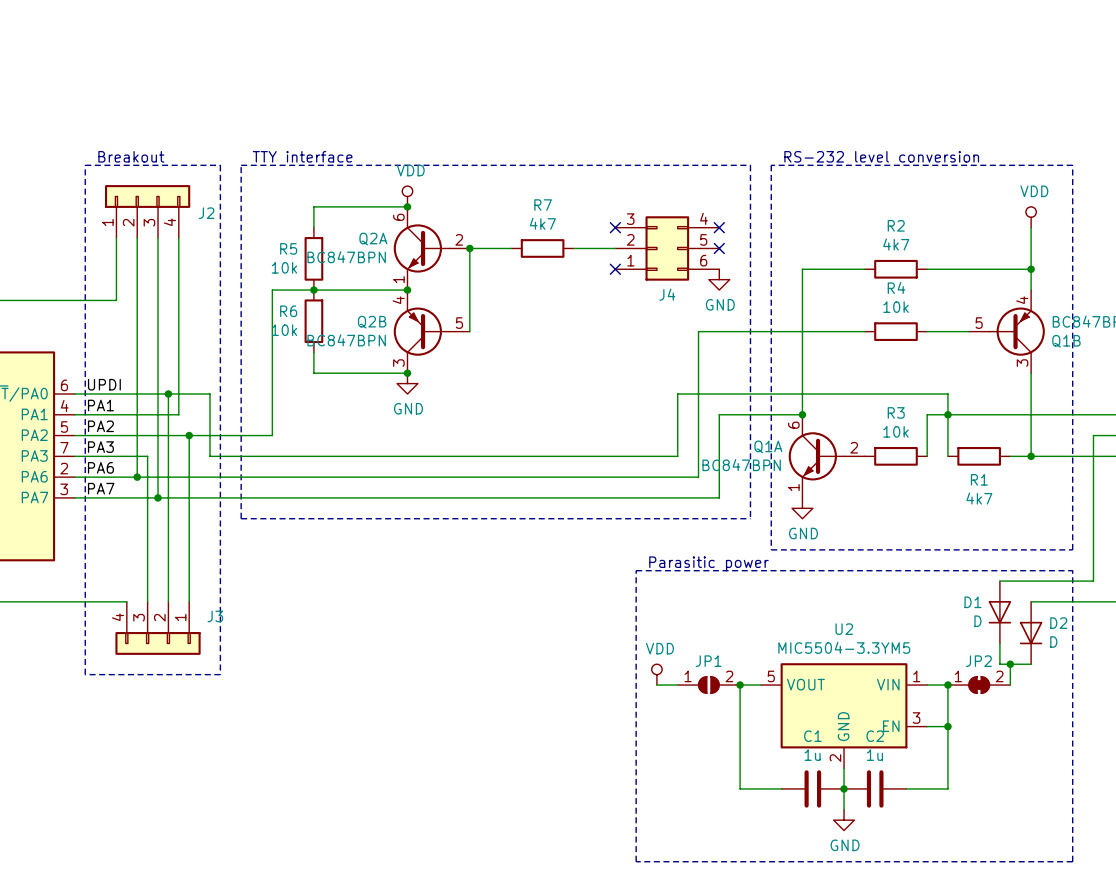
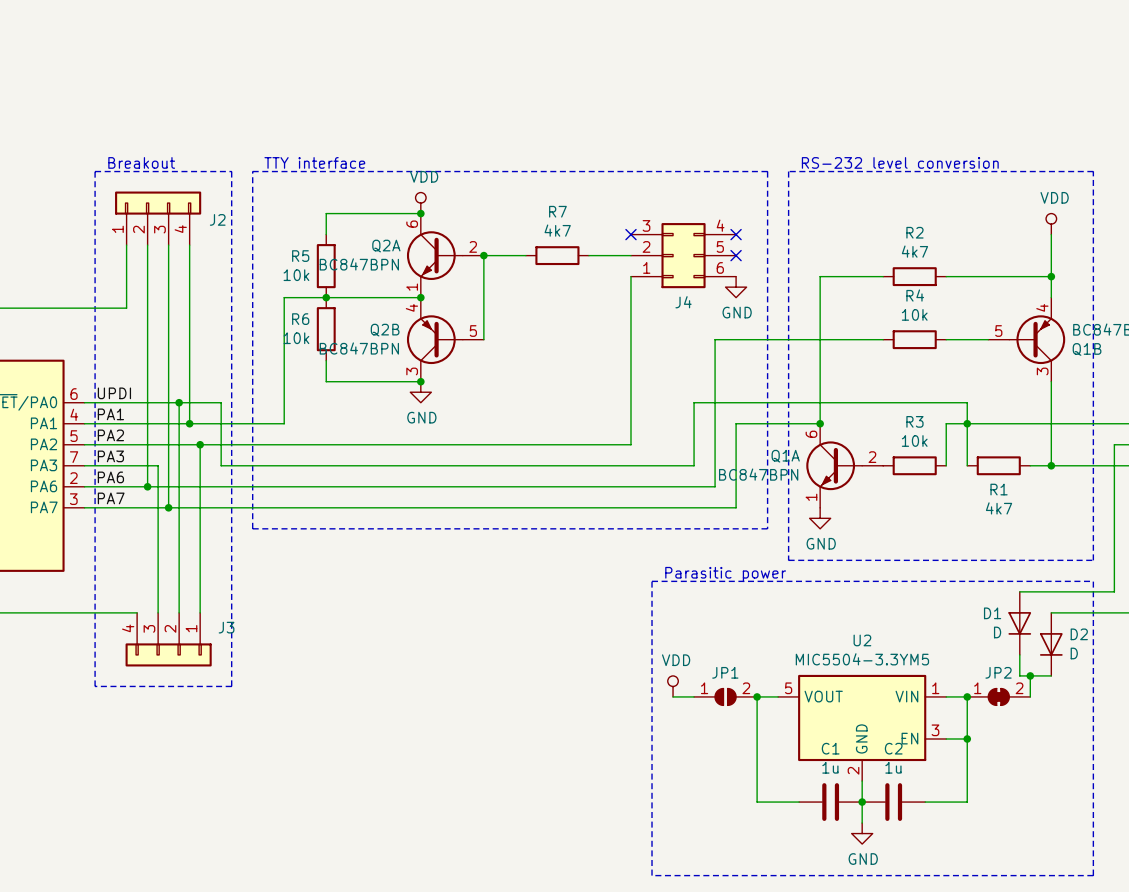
wire: none -> (630, 276) (630, 444) (284, 444)
no-connect mark: (615, 269) -> none
junction: none -> (189, 423)
wire: (272, 414) (272, 435) -> (284, 423) (189, 423)

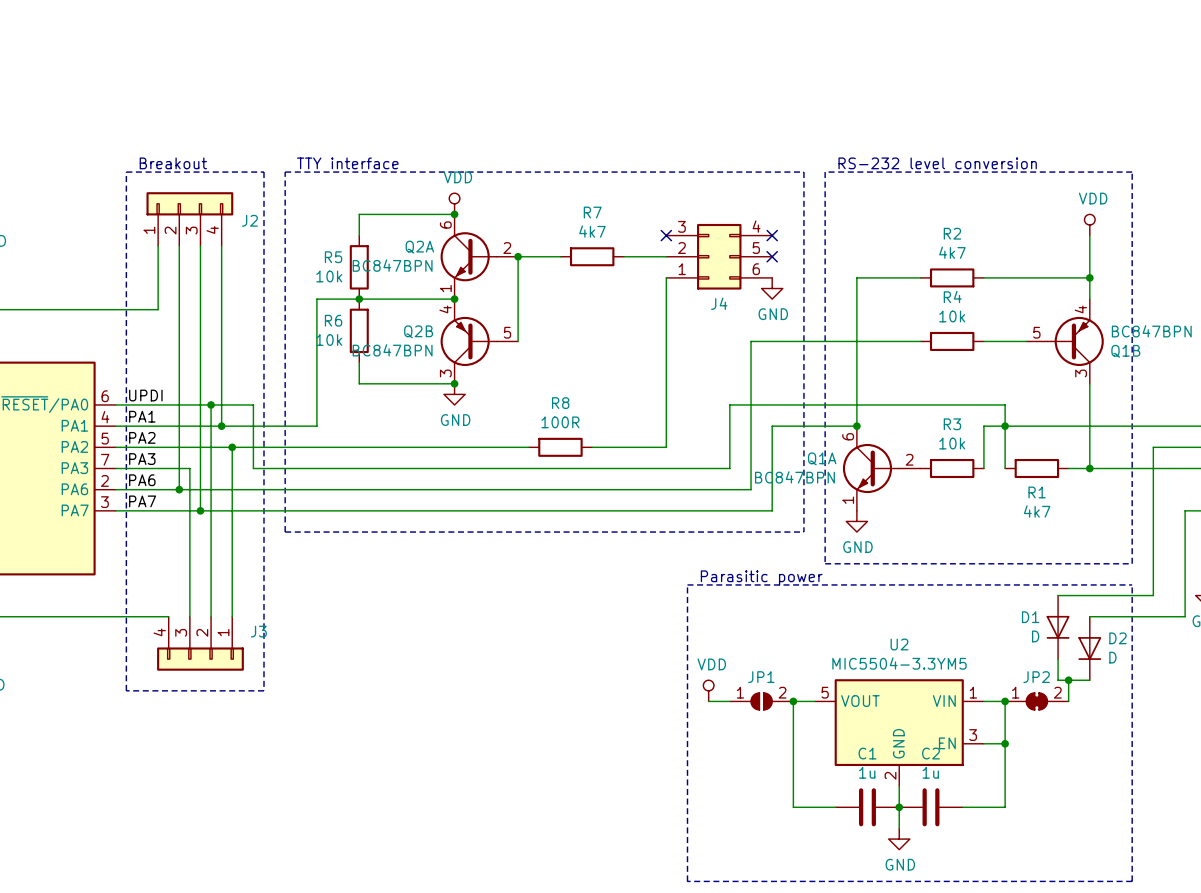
wire: (494, 444) (557, 444) -> none
R8: none -> 100R (560, 447)

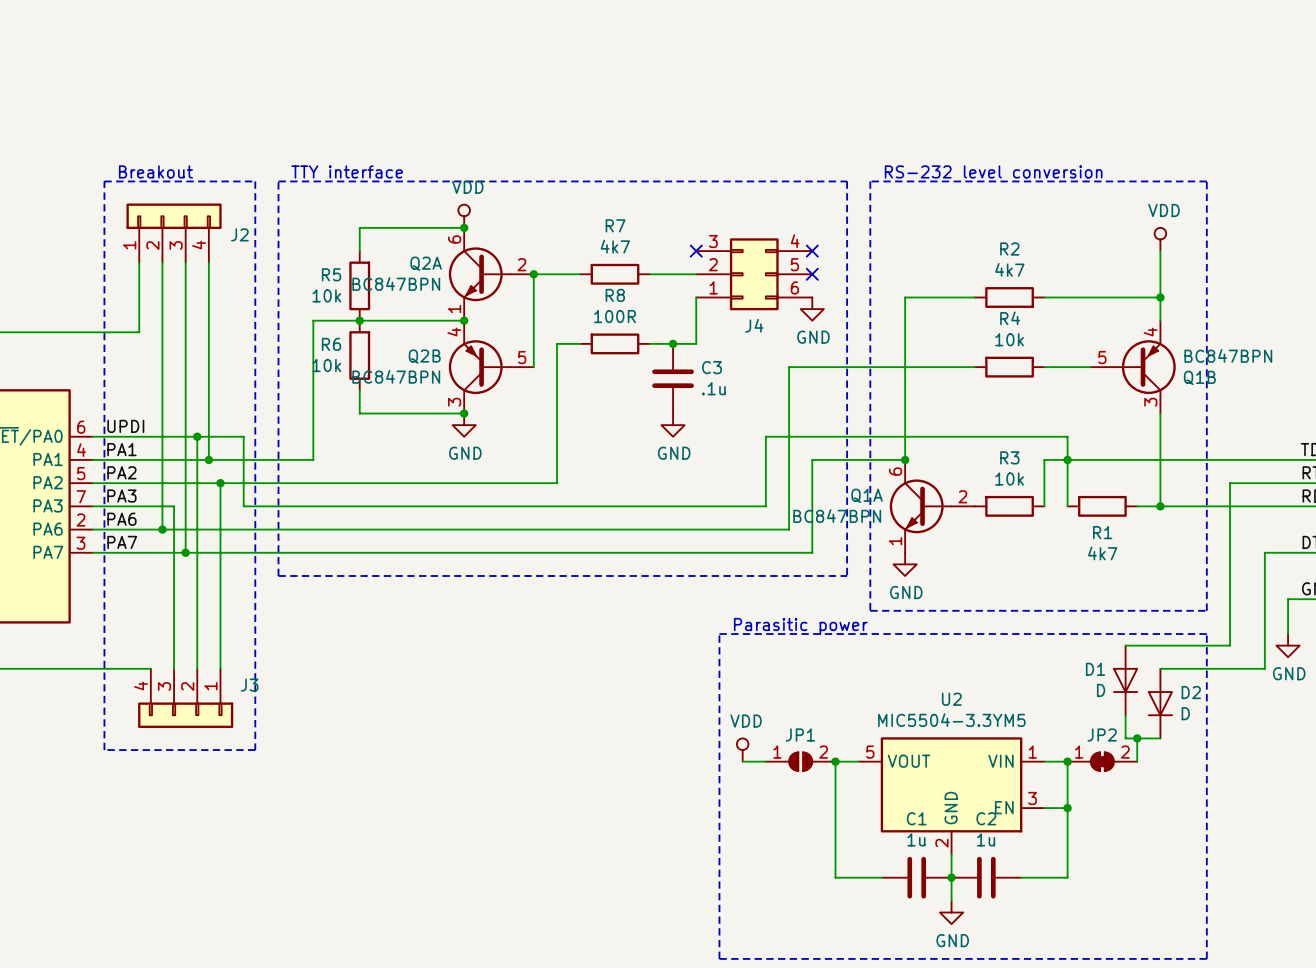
wire: none -> (580, 343) (557, 343) (557, 483) (545, 483)
junction: none -> (673, 343)
wire: (666, 320) (666, 447) (592, 447) -> (696, 343) (649, 343)
C3: none -> .1u (673, 378)
power symbol: none -> GND (673, 425)
R8 position: (560, 447) -> (615, 343)

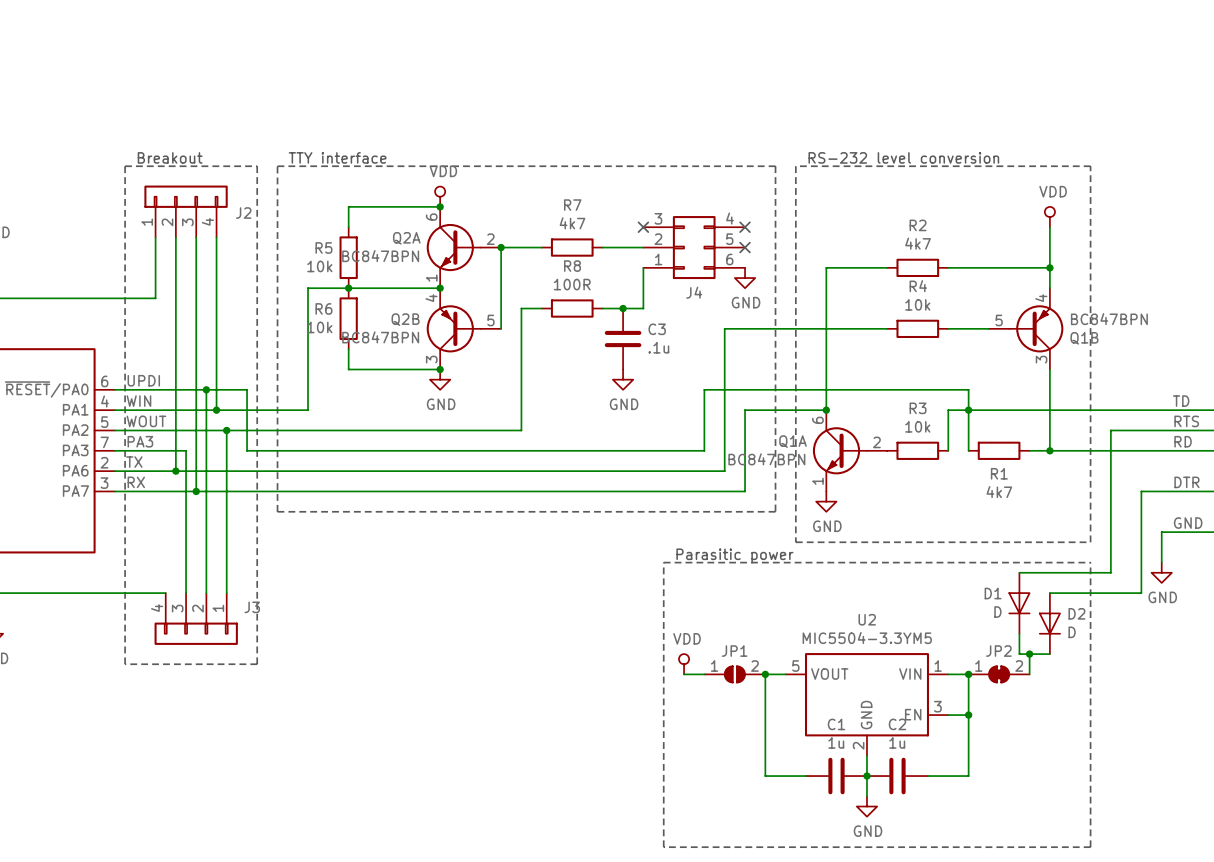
label: PA1 (121, 449) -> WIN (138, 401)
label: PA2 (121, 472) -> WOUT (146, 421)
label: PA6 (121, 519) -> TX (134, 462)
label: PA7 (122, 542) -> RX (136, 482)

